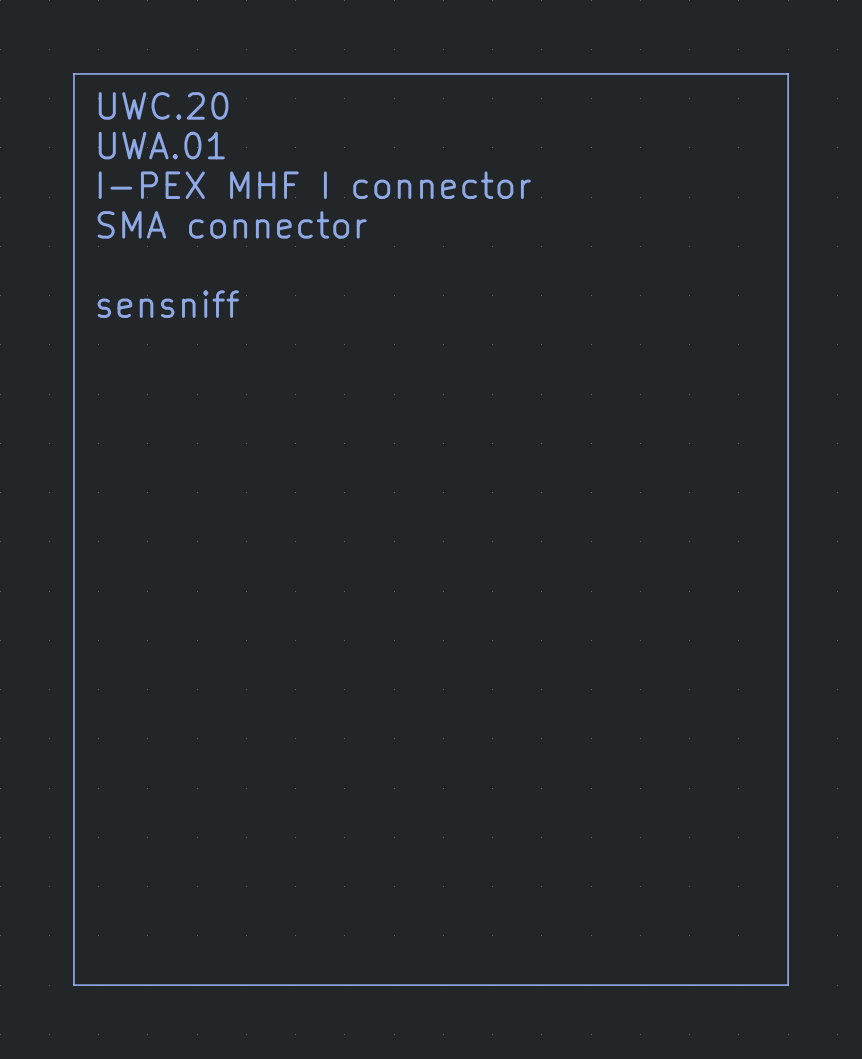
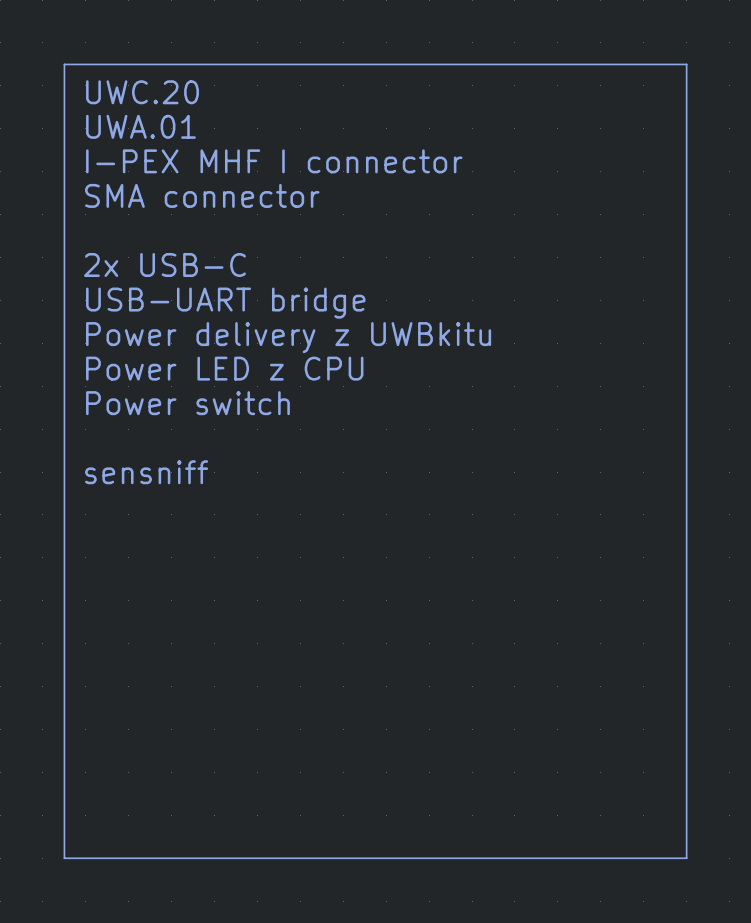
text: sensniff (168, 304) -> 2x USB-C (164, 264)
text: none -> USB-UART bridge (225, 303)
text: none -> Power delivery z UWBkitu (288, 337)
text: none -> Power LED z CPU (224, 368)
text: none -> Power switch (187, 403)
text: none -> sensniff (146, 472)

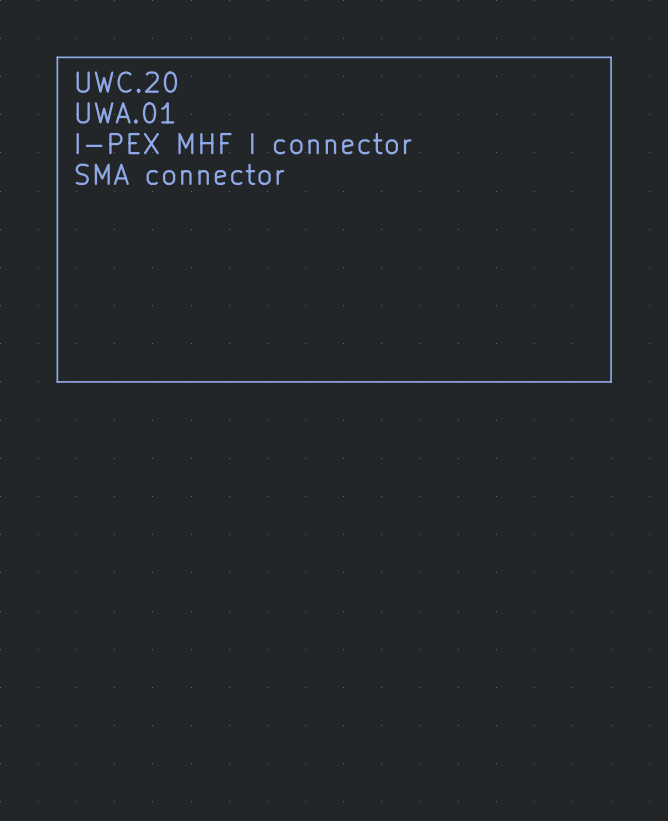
text: 2x USB-C (164, 264) -> none
text: USB-UART bridge (225, 303) -> none
text: Power delivery z UWBkitu (288, 337) -> none
text: Power LED z CPU (224, 368) -> none
text: Power switch (187, 403) -> none
line: (64, 429) (64, 858) (686, 858) (686, 429) -> (57, 381) (611, 381)
text: sensniff (146, 472) -> none

